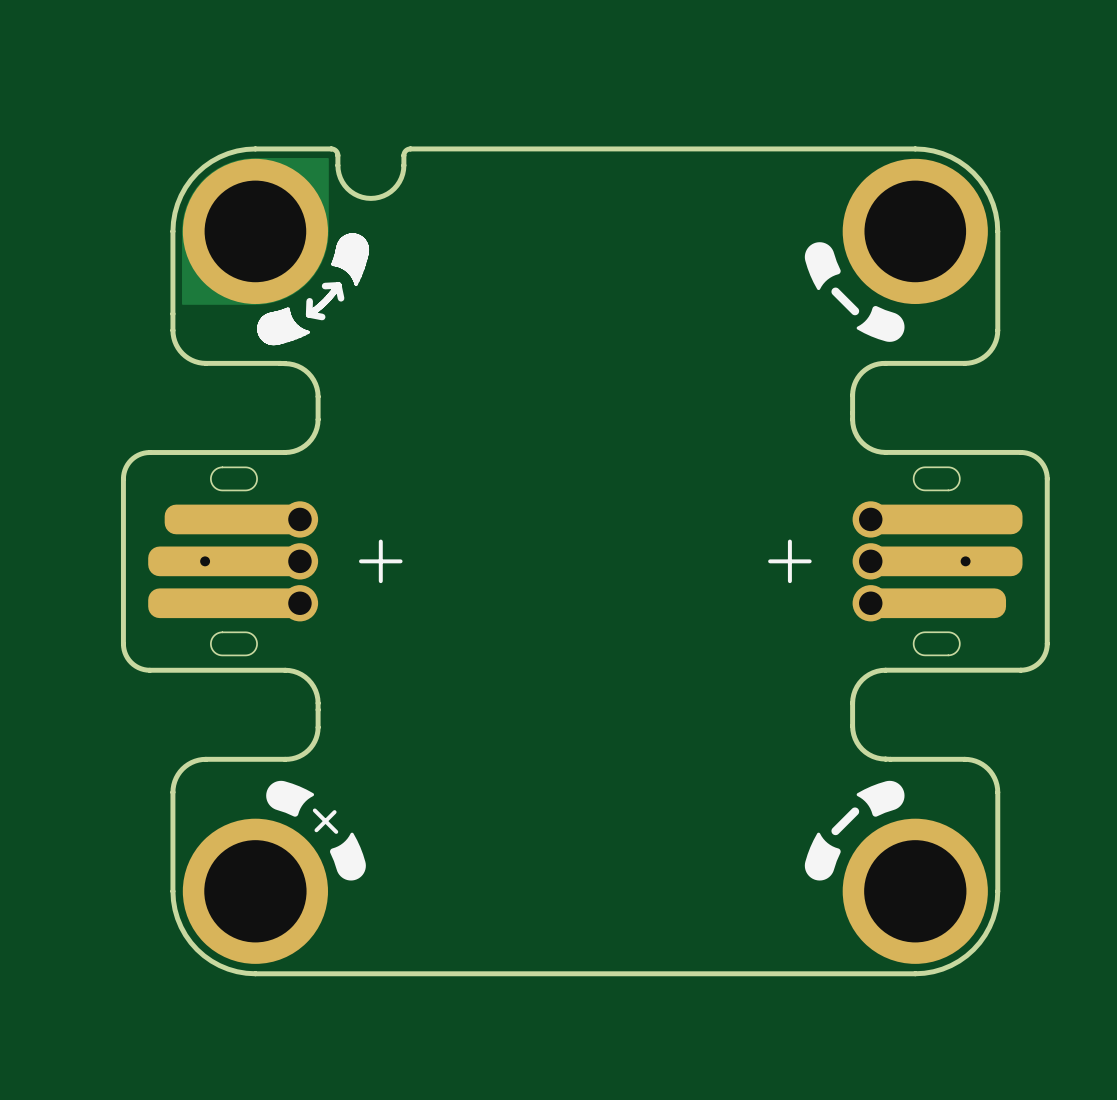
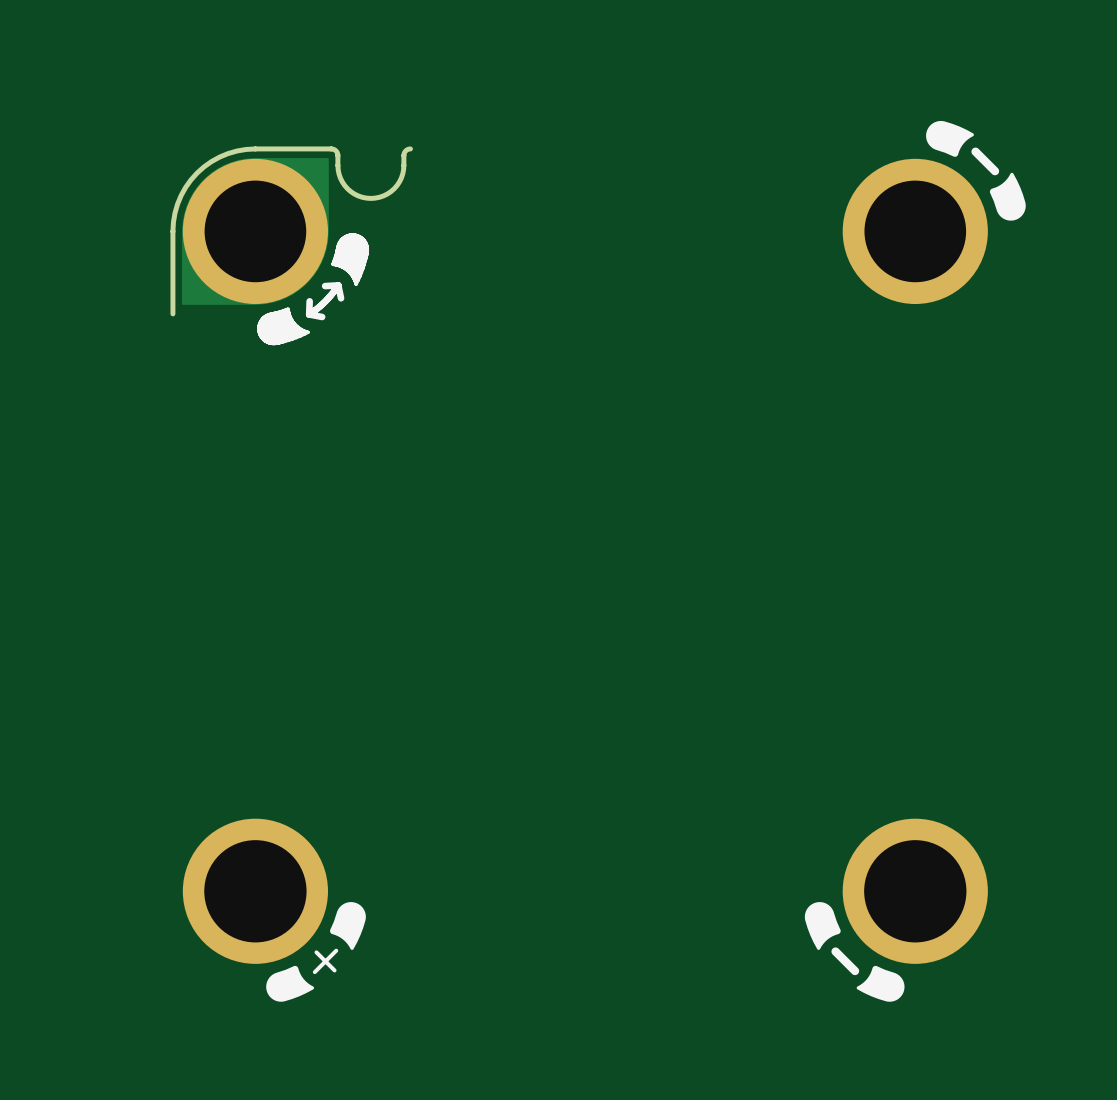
board edge: (410, 148) (915, 148) (942, 153) (959, 161) (973, 173) (985, 187) (993, 204) (997, 231) (997, 330) -> none
part rotation: 0° (896, 250) -> 180° (934, 212)
board edge: (172, 313) (172, 330) -> none
part: (261, 561) -> none
part: (908, 561) -> none
board edge: (172, 792) (173, 900) (181, 927) (190, 942) (211, 961) (228, 969) (255, 973) (915, 973) (933, 971) (951, 965) (973, 949) (985, 935) (993, 918) (997, 891) (997, 792) -> none
part rotation: 0° (274, 872) -> 90° clockwise (274, 910)
part rotation: 0° (896, 872) -> 90° counterclockwise (896, 910)

